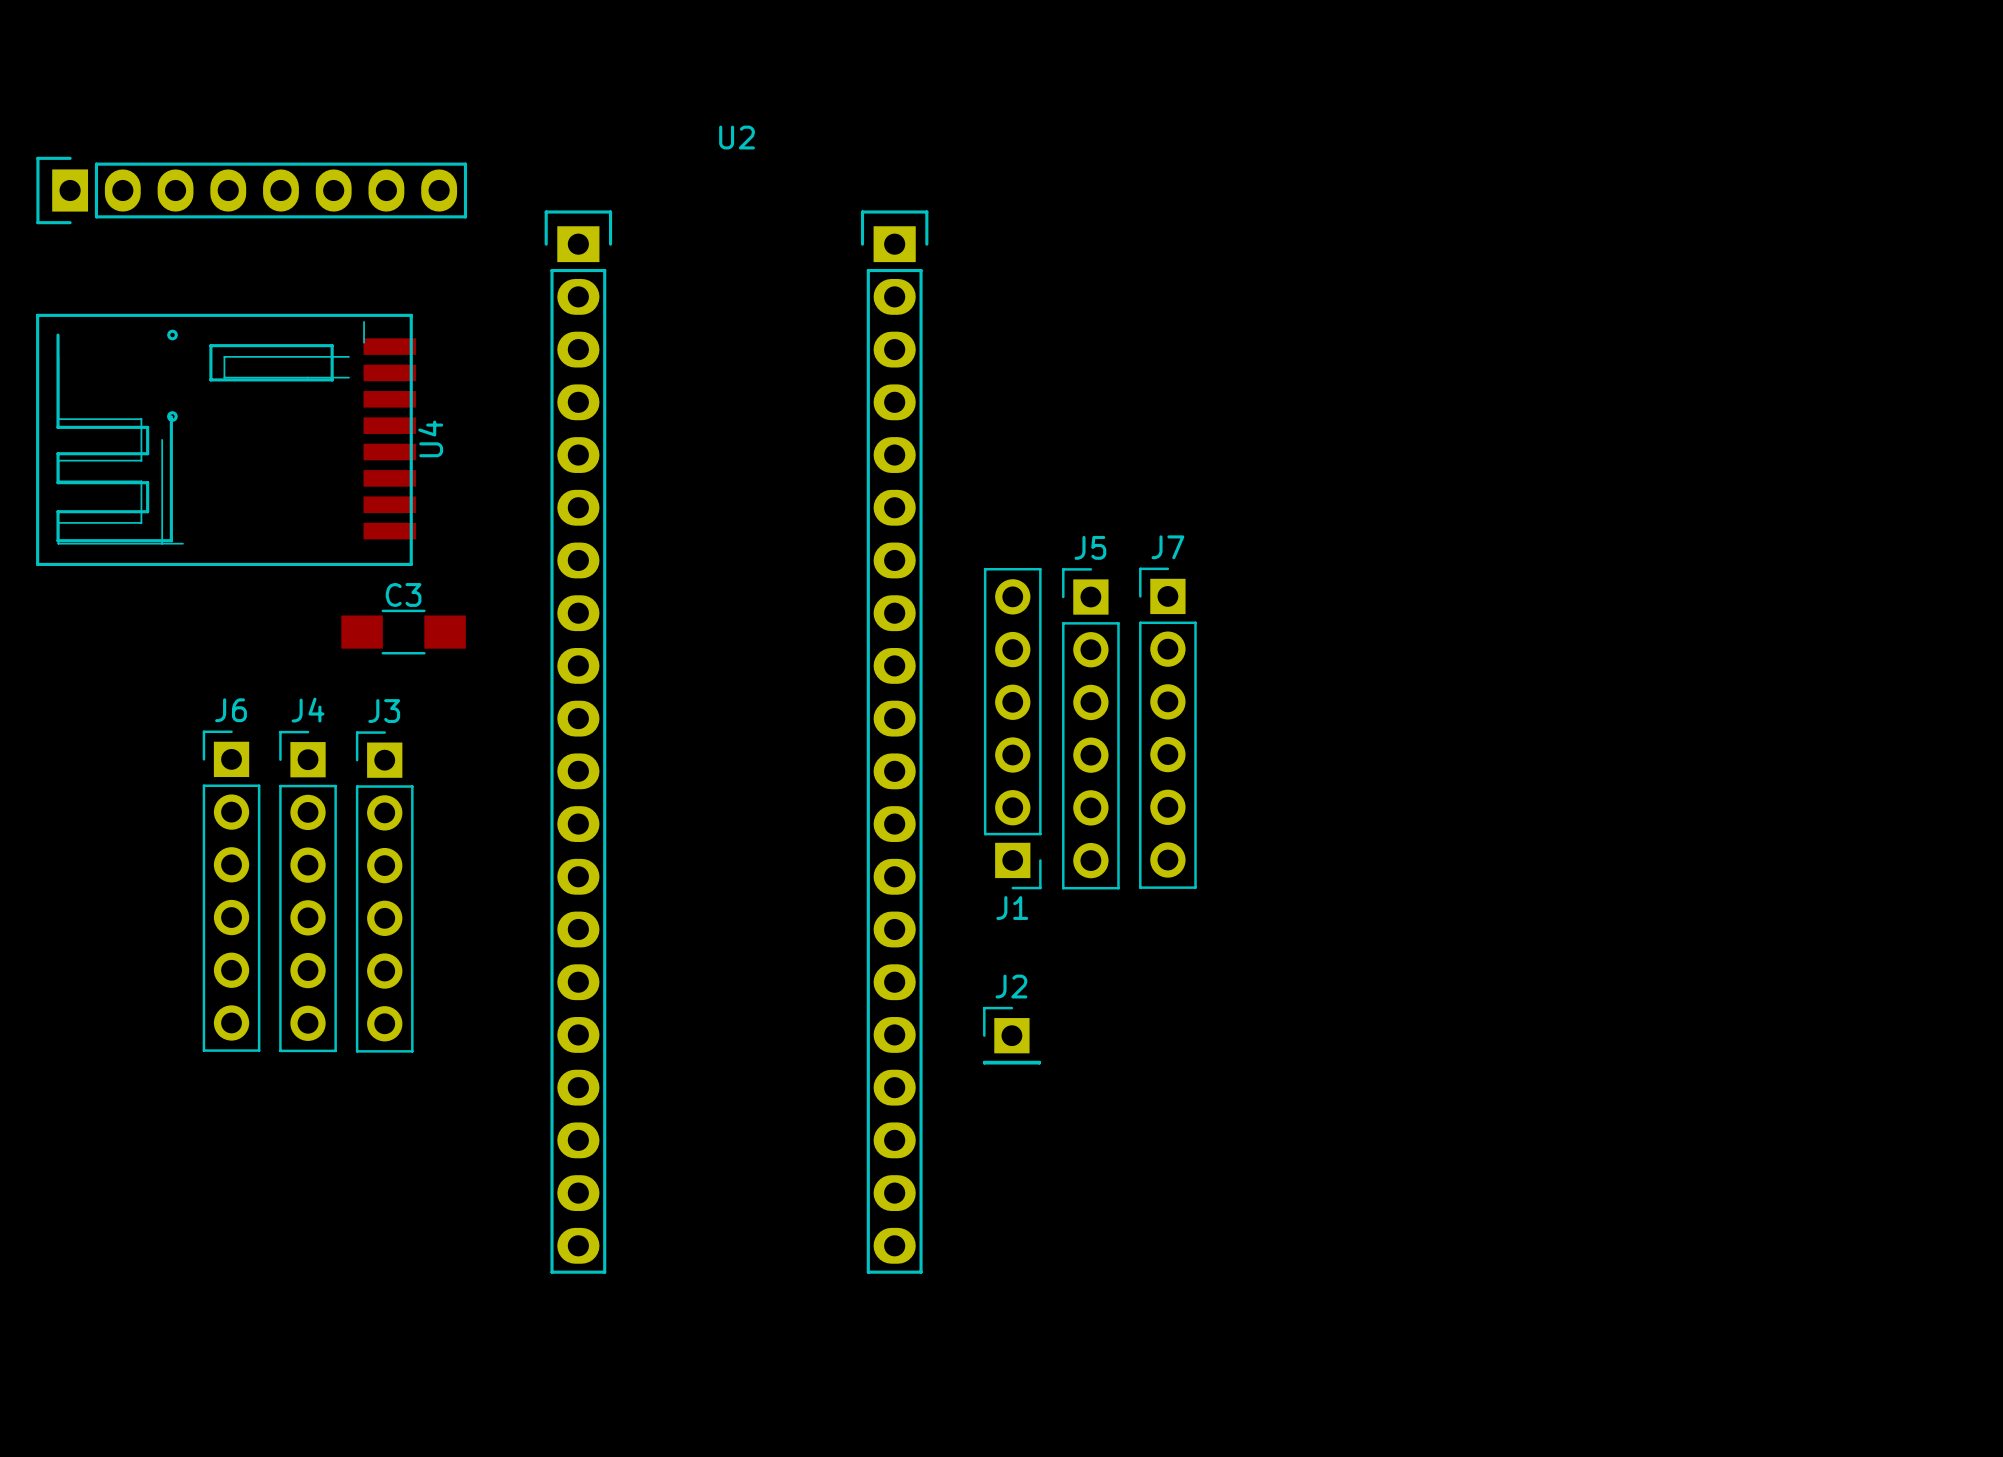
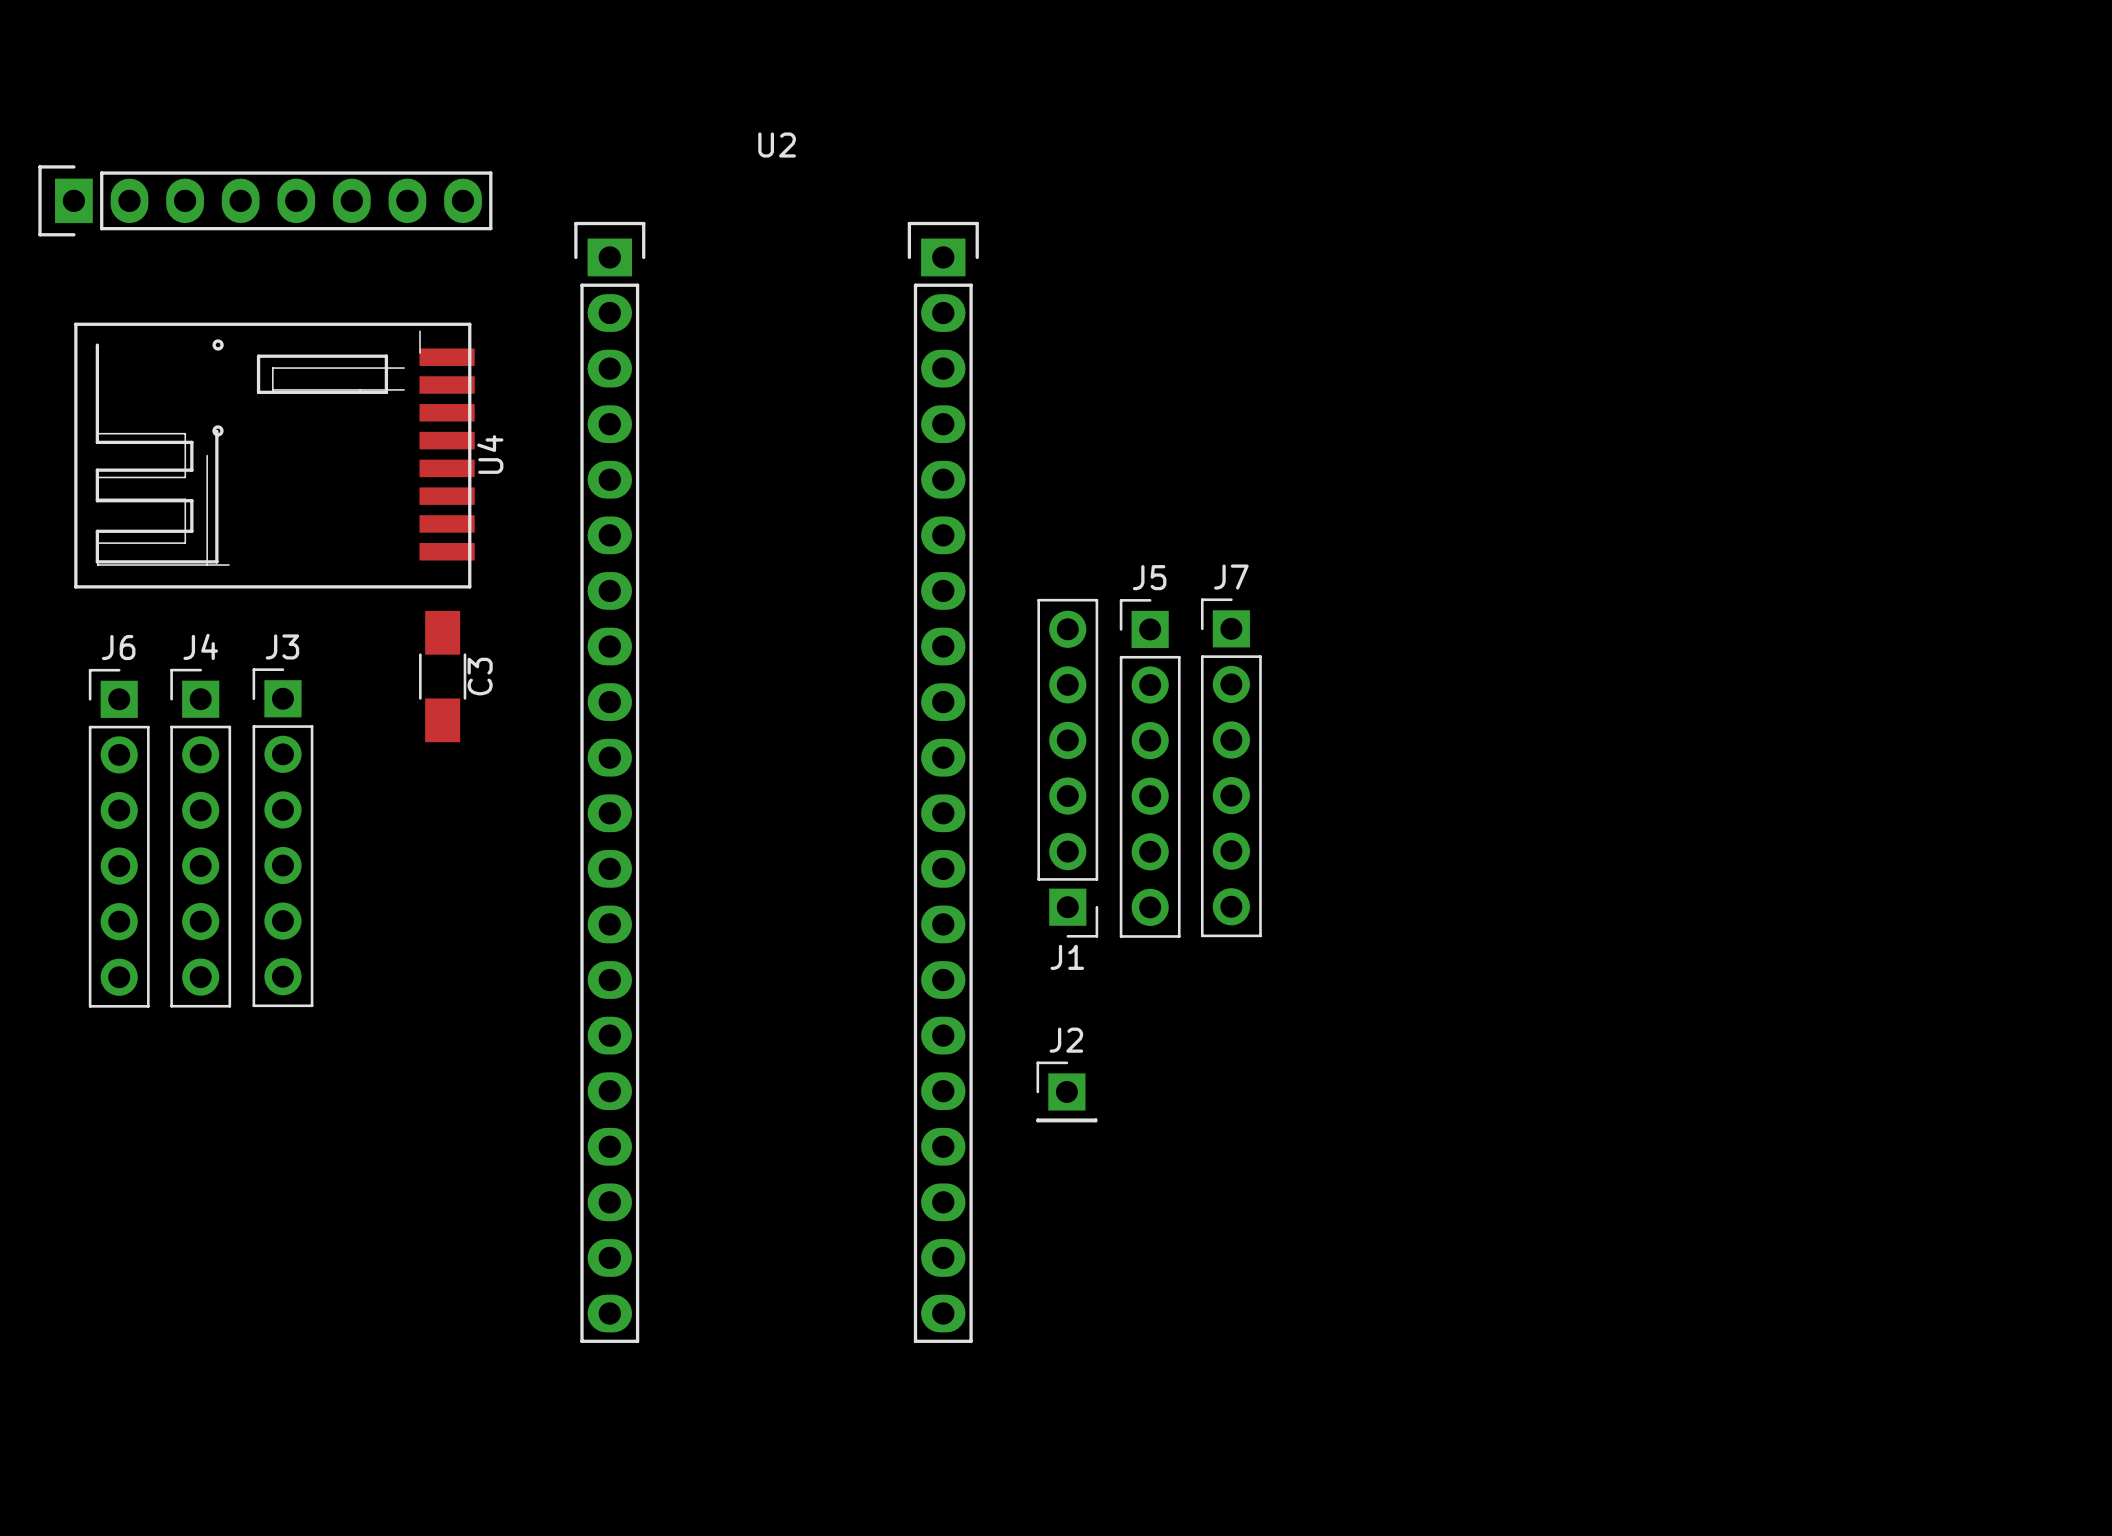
U4 position: (226, 439) -> (274, 455)
C3 rotation: 0° (403, 632) -> 90° clockwise (442, 676)
J6 position: (231, 891) -> (119, 838)
J4 position: (308, 891) -> (200, 838)
J3 position: (384, 891) -> (282, 837)

